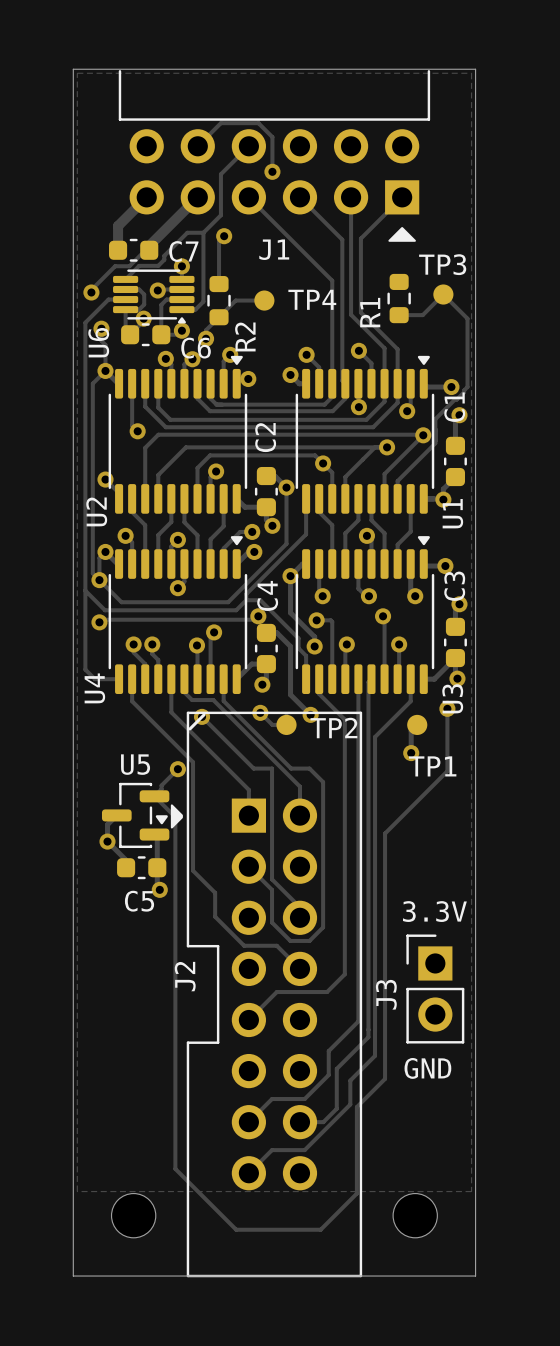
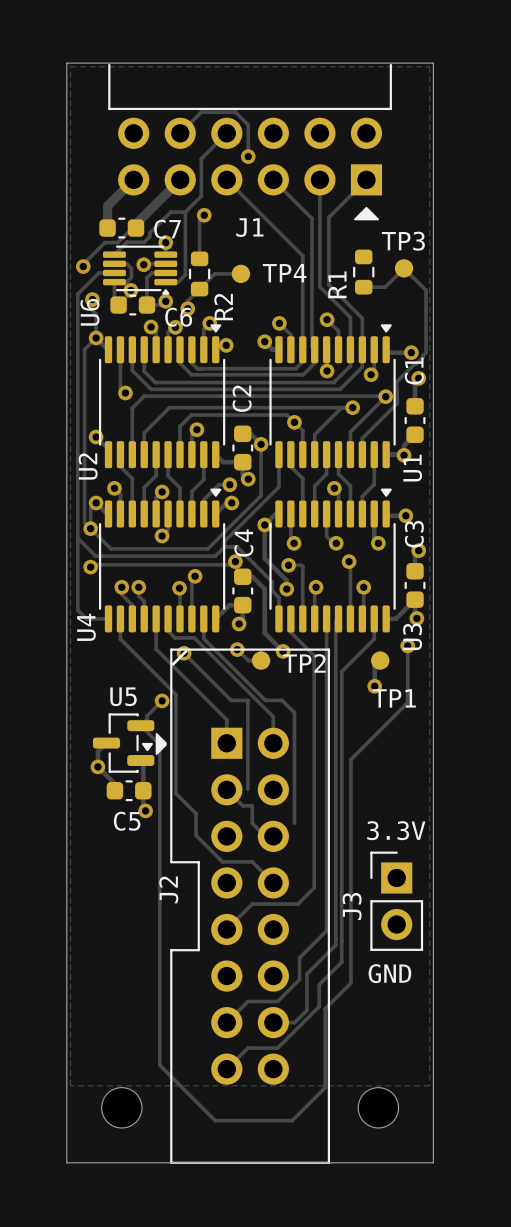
track: (272, 865) (272, 879) (299, 907) (299, 917) -> none
track: (266, 884) (272, 889) (272, 922) (290, 940) (309, 940) (323, 927) (323, 903) -> (242, 805) (252, 805) (252, 823) (264, 835)

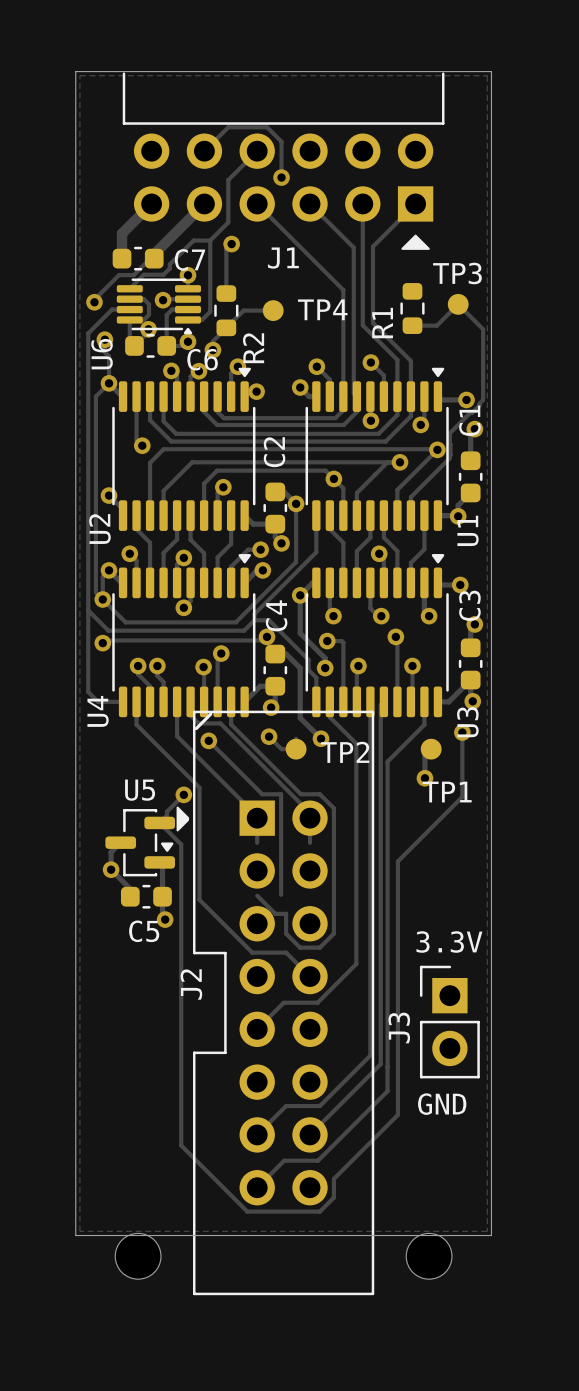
track: (196, 813) (196, 835) (222, 861) (252, 861) (273, 882) -> (222, 922) (252, 952) (286, 952) (310, 976)
track: none -> (333, 933) (319, 947)
track: (314, 850) (314, 887) (298, 904) (252, 904) (226, 929) -> (356, 963) (317, 1002) (283, 1002) (257, 1029)
J2 position: (242, 906) -> (275, 1002)
track: (335, 938) (335, 945) (306, 974) (306, 1010) (294, 1022) (273, 1022) -> (380, 1064) (310, 1134)
track: (299, 957) (299, 979) (277, 1001) (247, 1001) (226, 1022) -> (339, 1086) (319, 1106) (286, 1106) (257, 1134)
track: (319, 984) (319, 1006) (277, 1048) (247, 1048) (226, 1069) -> (362, 1116) (318, 1160) (284, 1160) (257, 1187)
track: (325, 1008) (325, 1087) (292, 1120) (215, 1120) (159, 1065) (159, 1010) -> (368, 1144) (333, 1178) (333, 1197) (319, 1211) (247, 1211) (181, 1145)
board edge: (66, 1089) (66, 1162) (433, 1162) (433, 1089) -> (75, 1235) (491, 1235)

